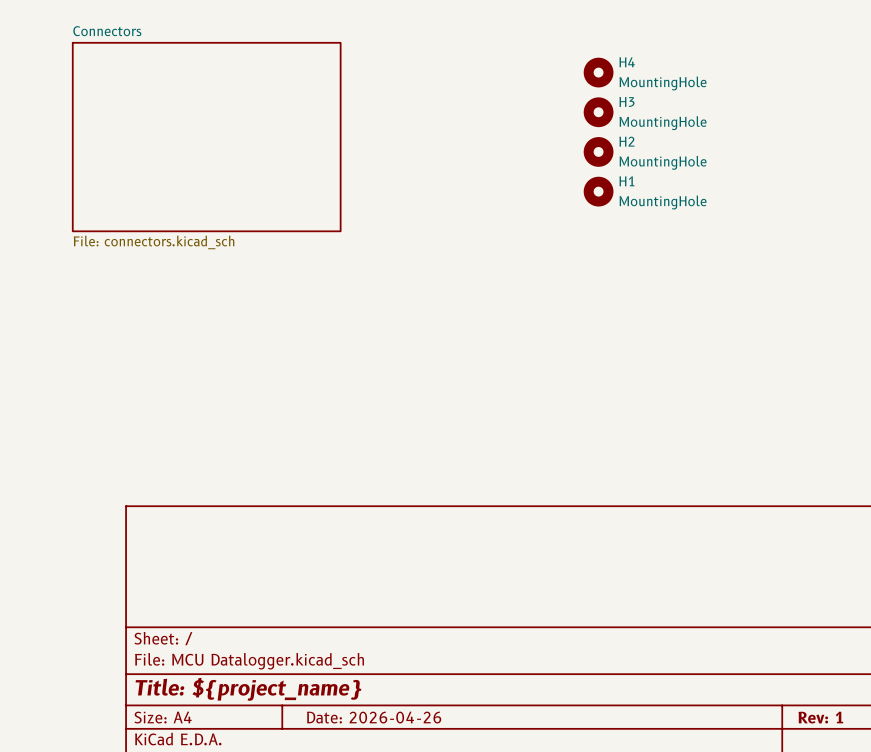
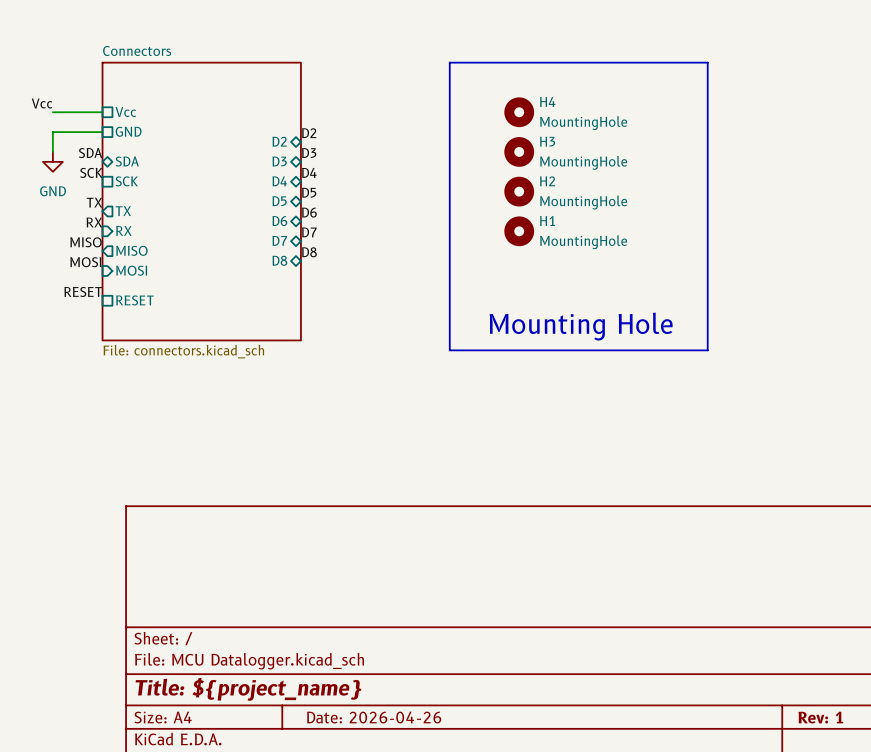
line: none -> (449, 62) (707, 62) (707, 350) (449, 350) (449, 62)
H4 position: (598, 72) -> (519, 112)
label: none -> Vcc (42, 103)
sheet pin: none -> Vcc (125, 111)
wire: none -> (52, 112) (102, 112)
H3 position: (598, 112) -> (519, 151)
sheet pin: none -> GND (128, 131)
wire: none -> (102, 132) (52, 132) (52, 151)
label: none -> D2 (309, 133)
sheet Connectors: File: connectors.kicad_sch (206, 137) -> none
sheet pin: none -> D2 (279, 141)
H2 position: (598, 151) -> (519, 191)
label: none -> SDA (90, 153)
label: none -> D3 (309, 153)
power symbol: none -> GND (52, 161)
sheet pin: none -> SDA (127, 161)
sheet pin: none -> D3 (279, 161)
label: none -> SCK (91, 172)
label: none -> D4 (309, 172)
sheet pin: none -> SCK (126, 181)
sheet pin: none -> D4 (279, 181)
H1 position: (598, 191) -> (519, 231)
label: none -> D5 (309, 192)
sheet Connectors: none -> File: connectors.kicad_sch (201, 201)
sheet pin: none -> D5 (279, 201)
label: none -> TX (94, 202)
sheet pin: none -> TX (123, 211)
label: none -> D6 (309, 212)
sheet pin: none -> D6 (279, 221)
label: none -> RX (94, 222)
sheet pin: none -> RX (123, 230)
label: none -> D7 (309, 232)
sheet pin: none -> D7 (279, 240)
label: none -> MISO (86, 242)
sheet pin: none -> MISO (131, 250)
label: none -> D8 (309, 252)
sheet pin: none -> D8 (279, 260)
label: none -> MOSI (85, 262)
sheet pin: none -> MOSI (131, 270)
label: none -> RESET (83, 291)
sheet pin: none -> RESET (134, 300)
text: none -> Mounting Hole (581, 326)

